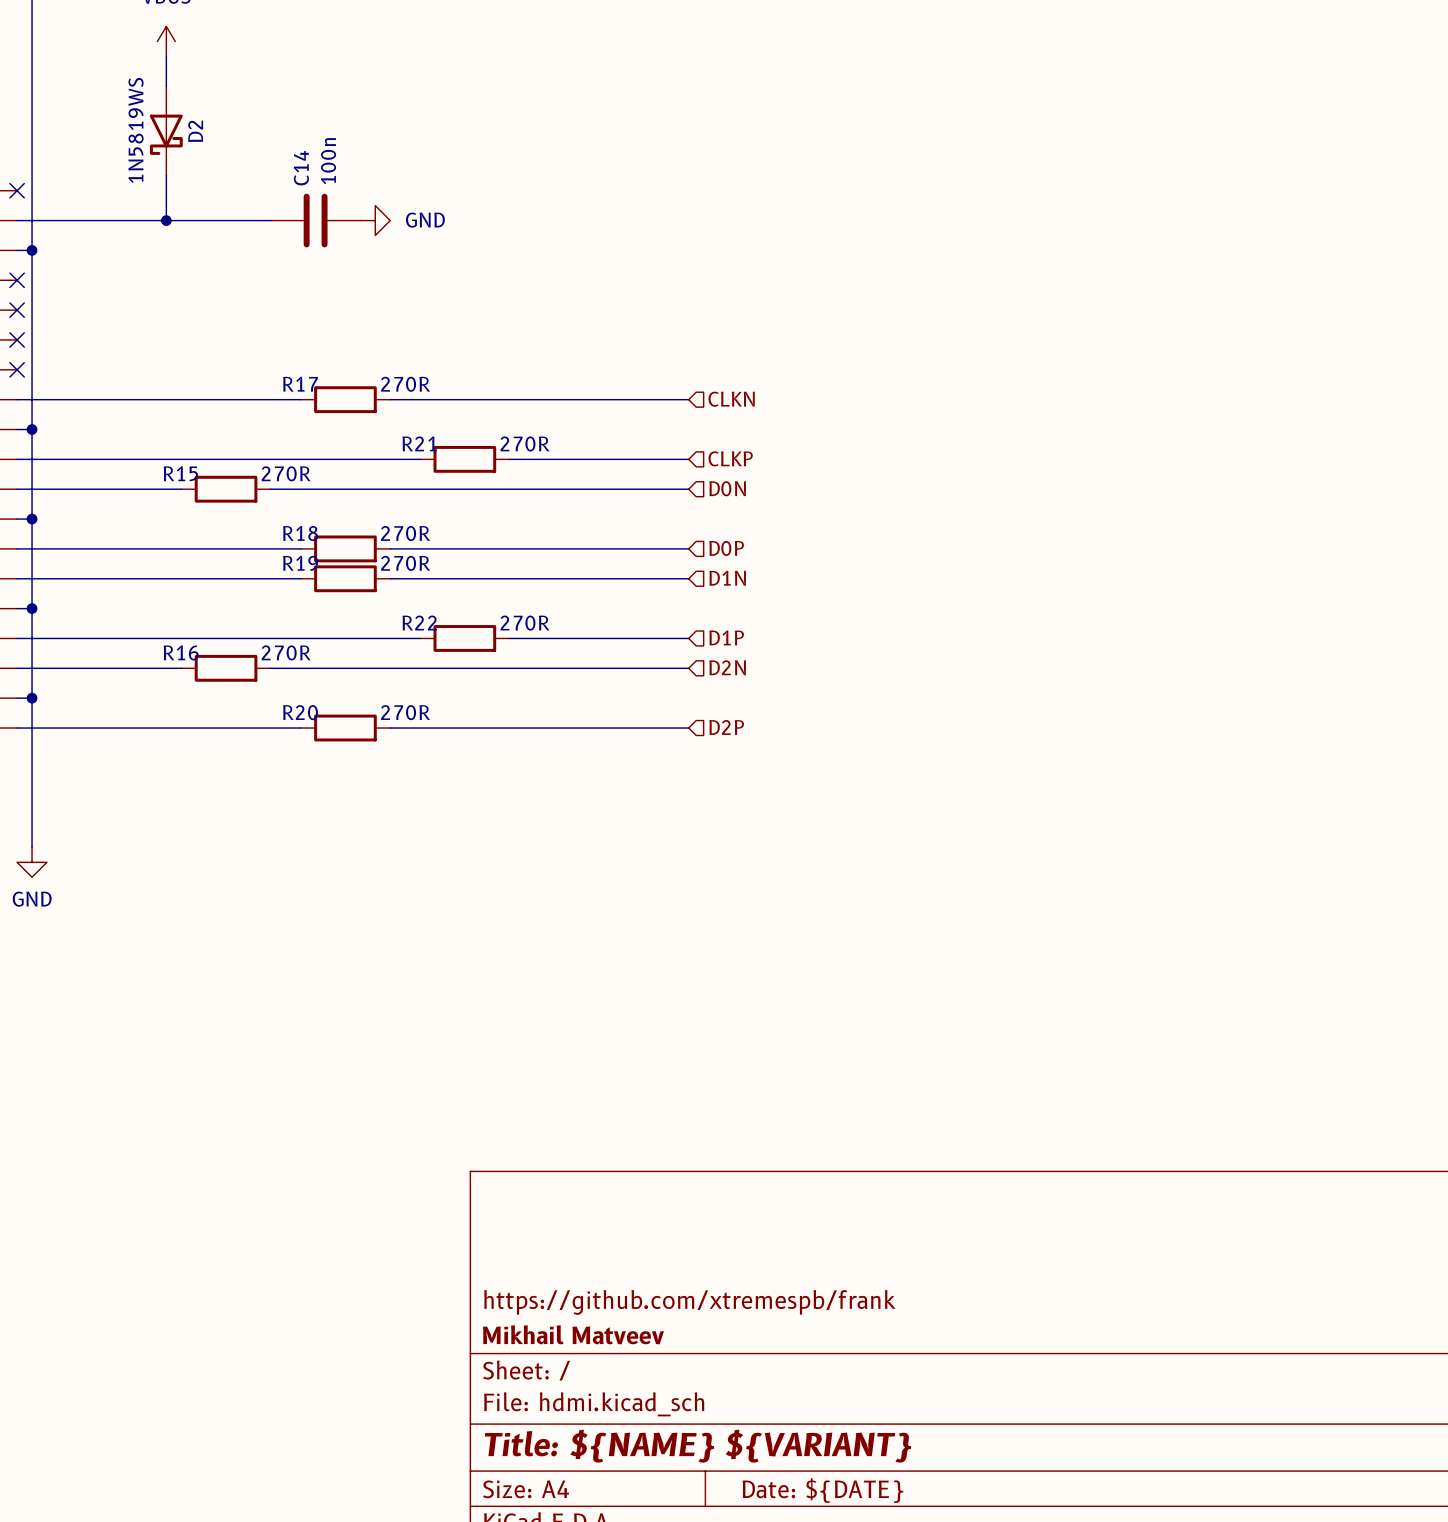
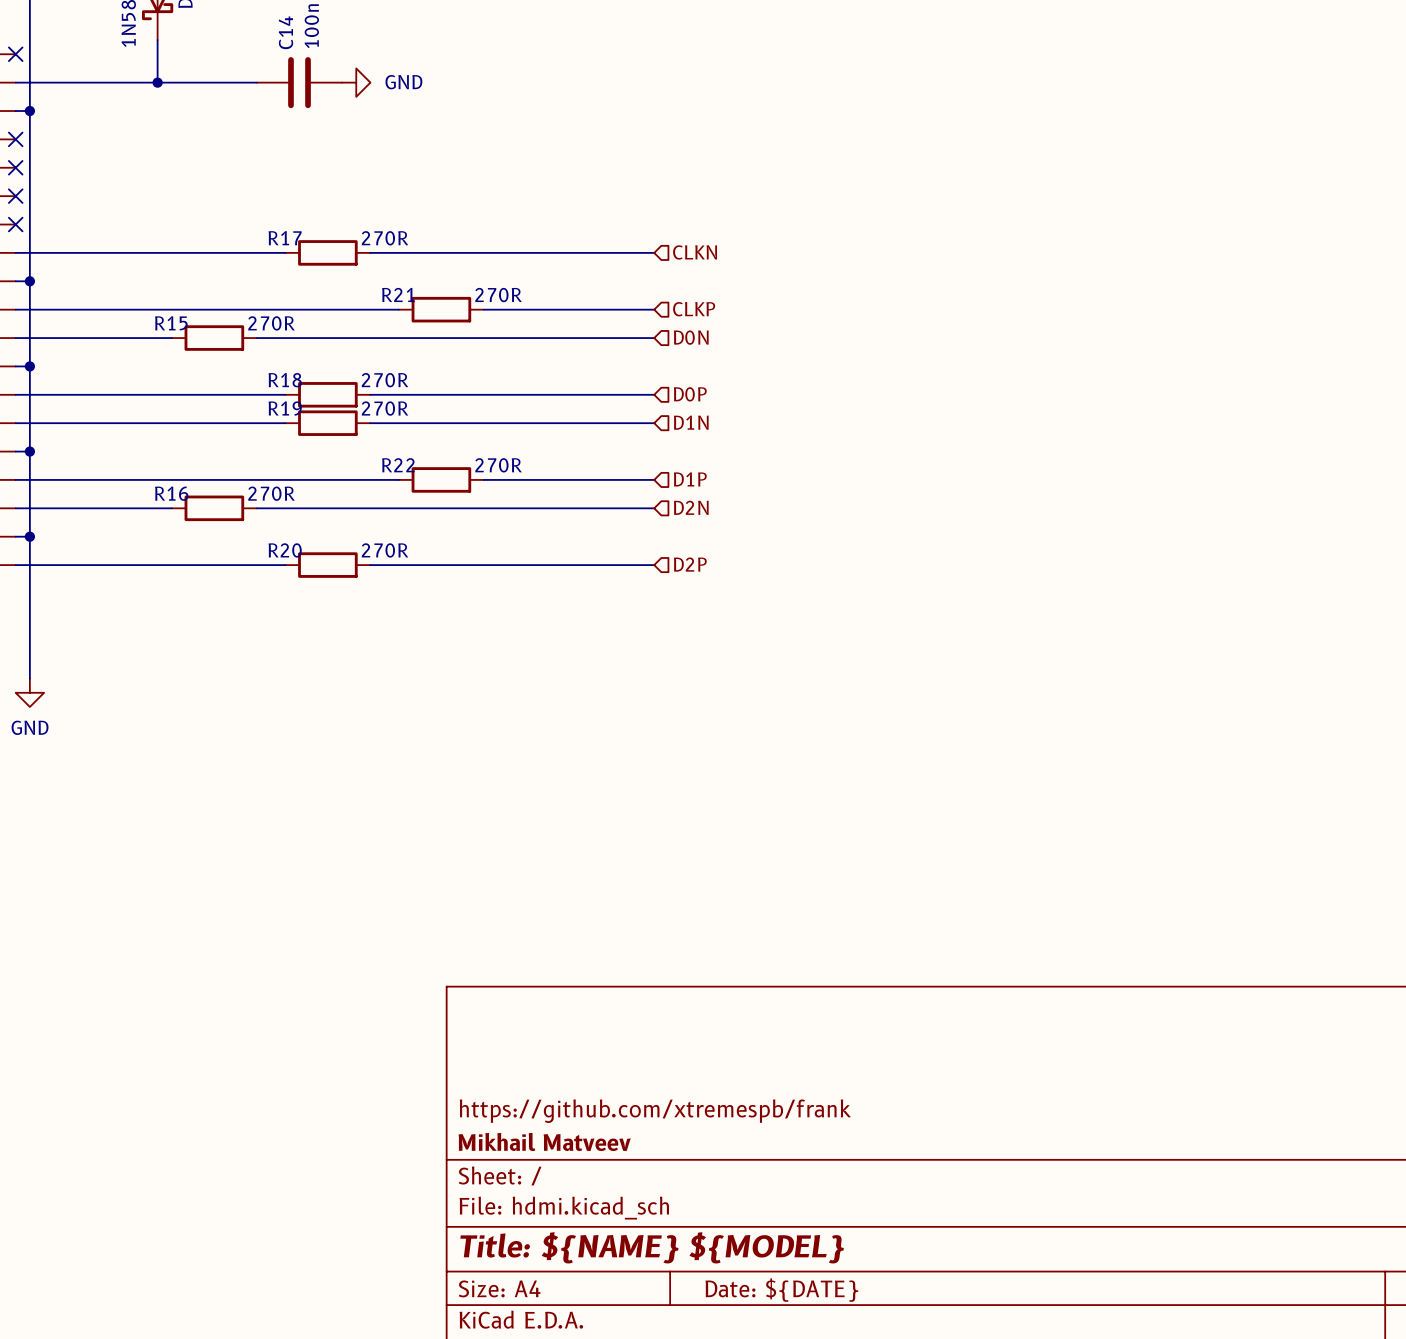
title block: Title: ${NAME} ${VARIANT} (698, 1446) -> Title: ${NAME} ${MODEL} (652, 1247)

